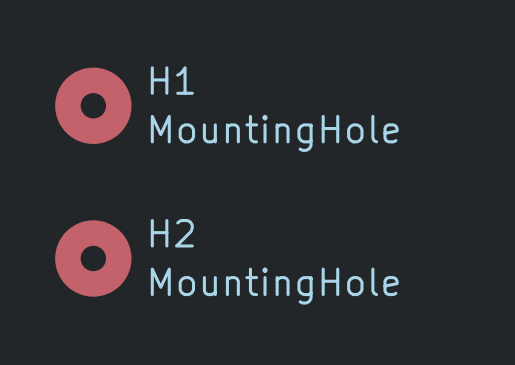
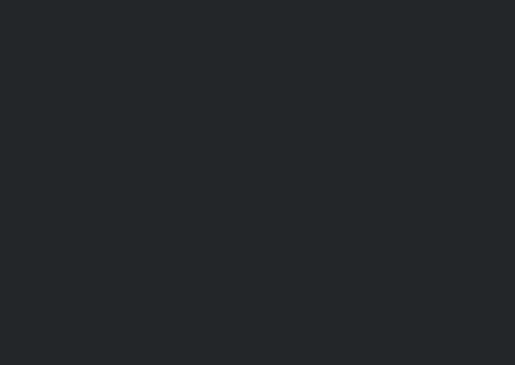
H1: MountingHole (93, 105) -> none
H2: MountingHole (93, 258) -> none

